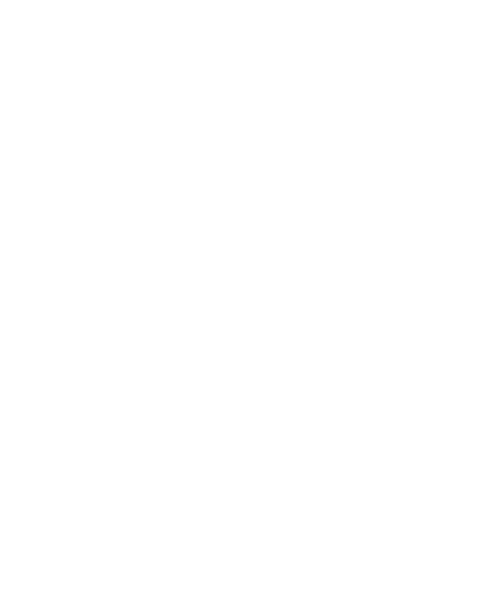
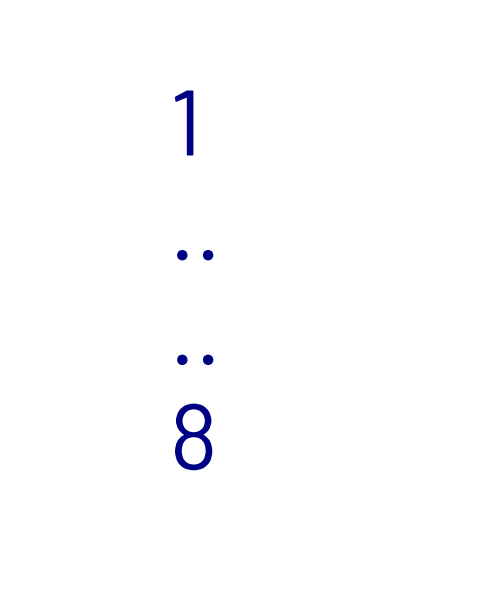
text: none -> 1 (184, 123)
text: none -> .. (195, 255)
text: none -> .. (195, 359)
text: none -> 8 (193, 436)

